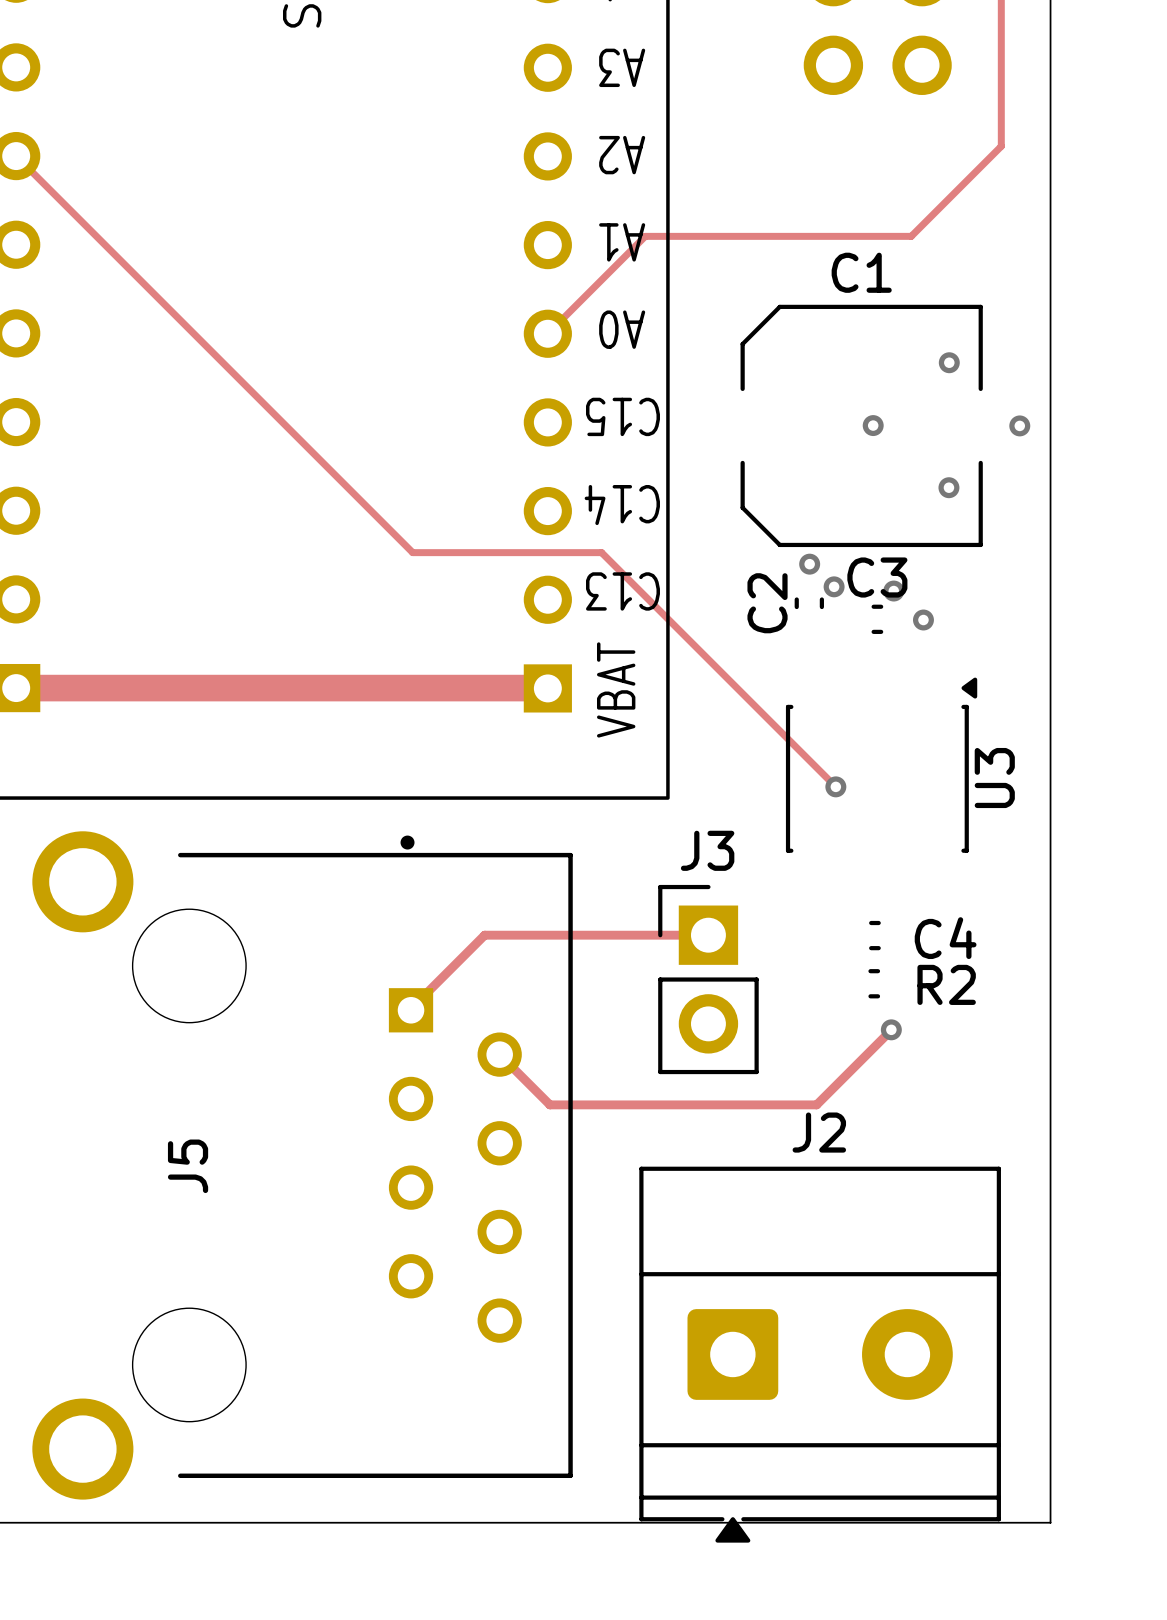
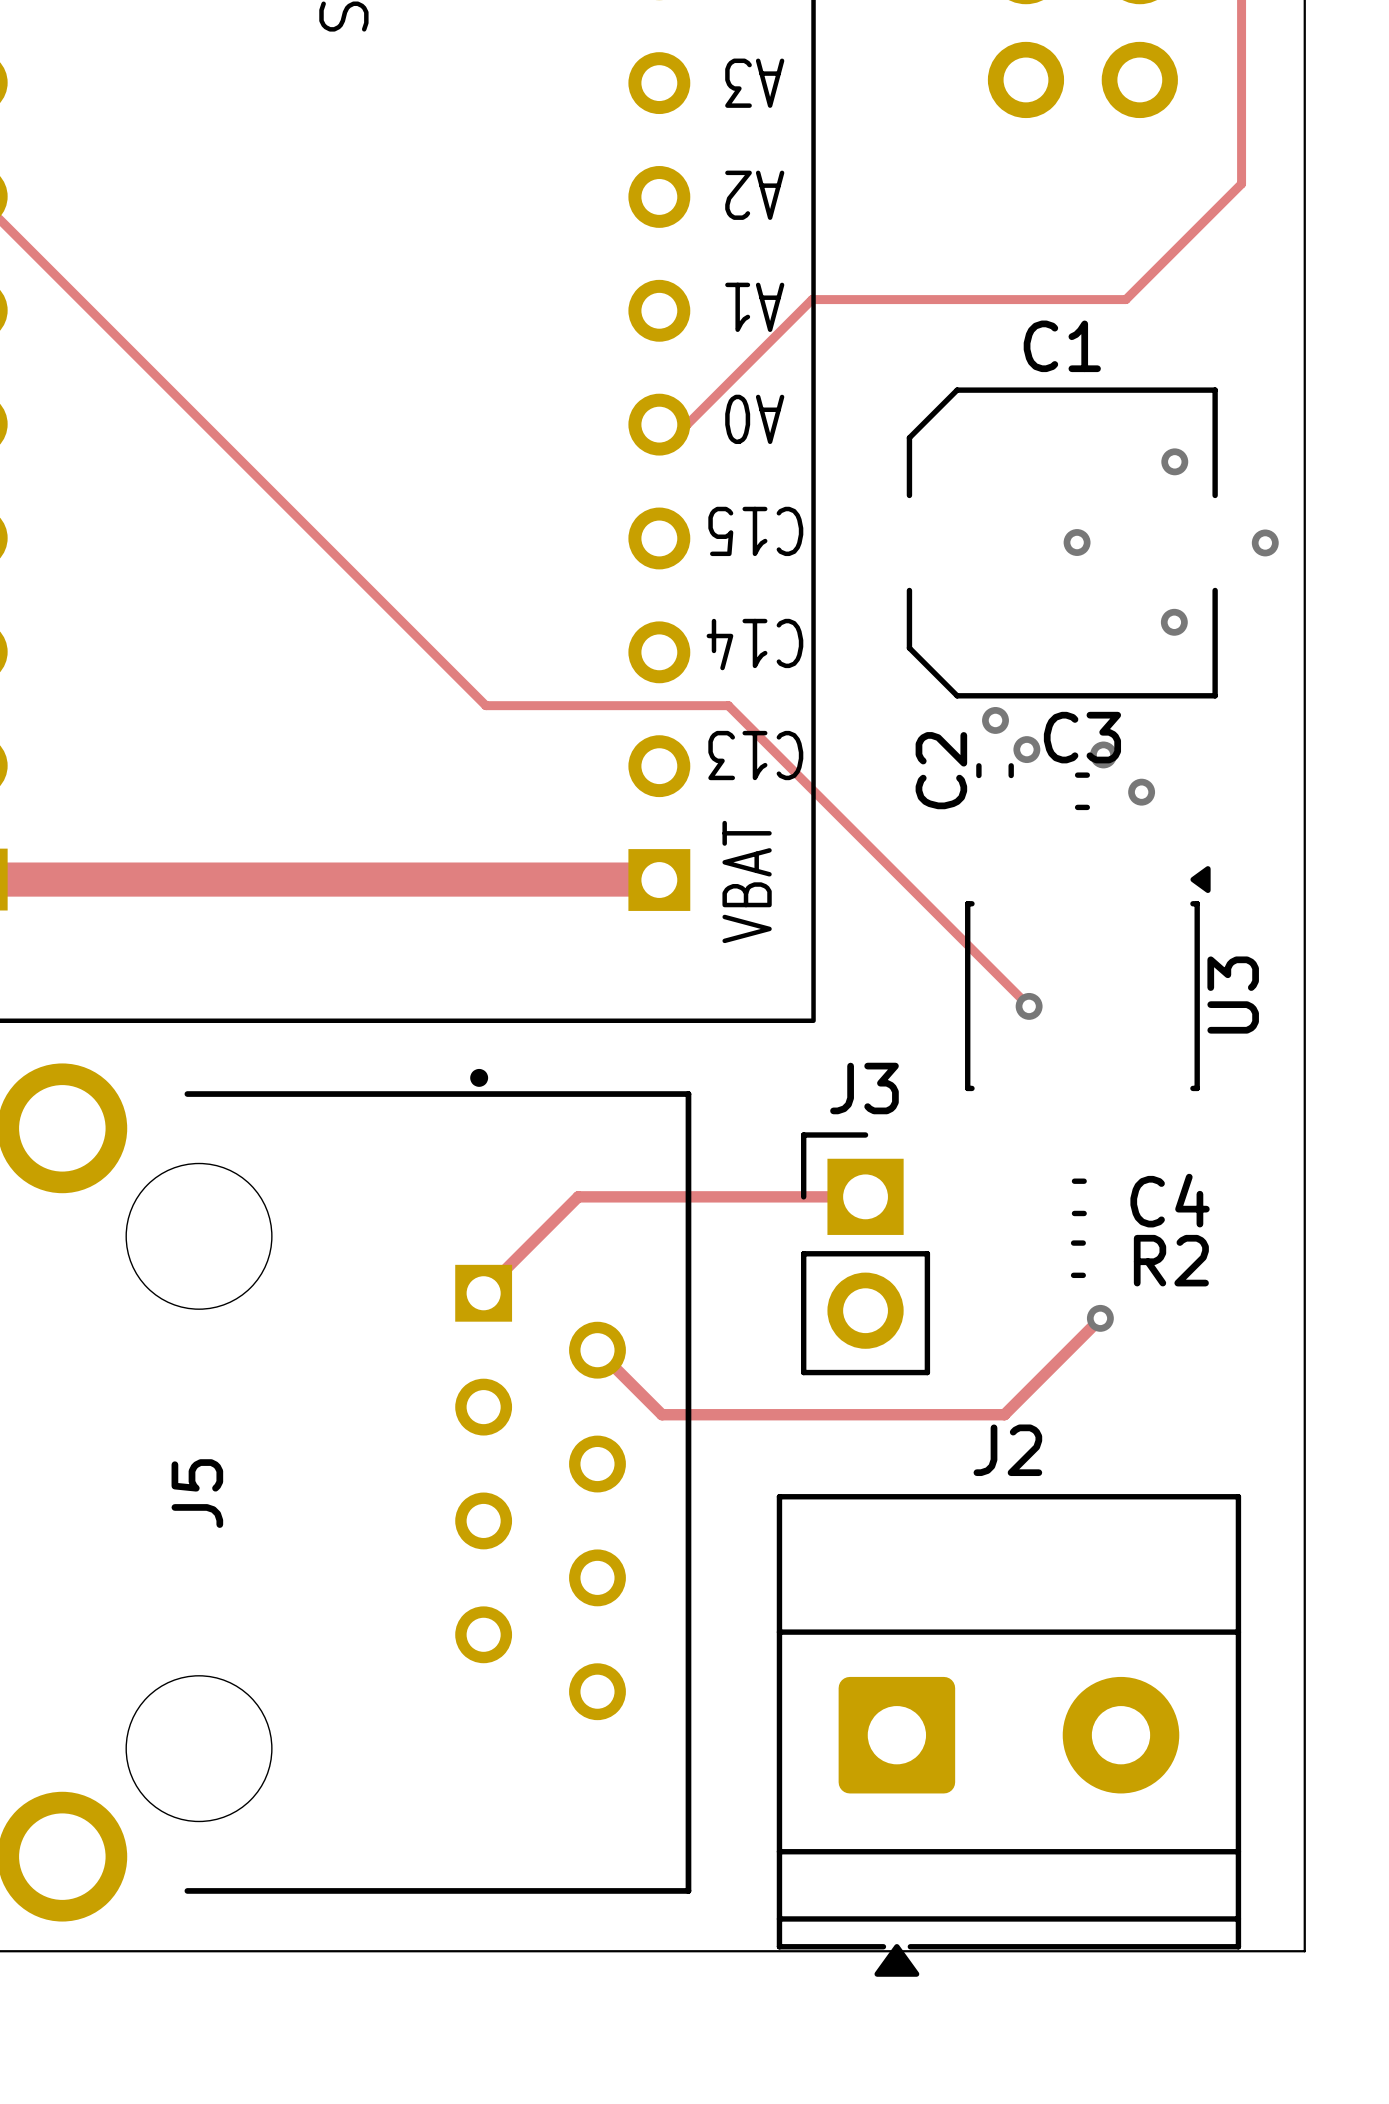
track: (666, 236) (645, 236) (547, 333) -> (812, 299) (687, 424) (659, 424)

